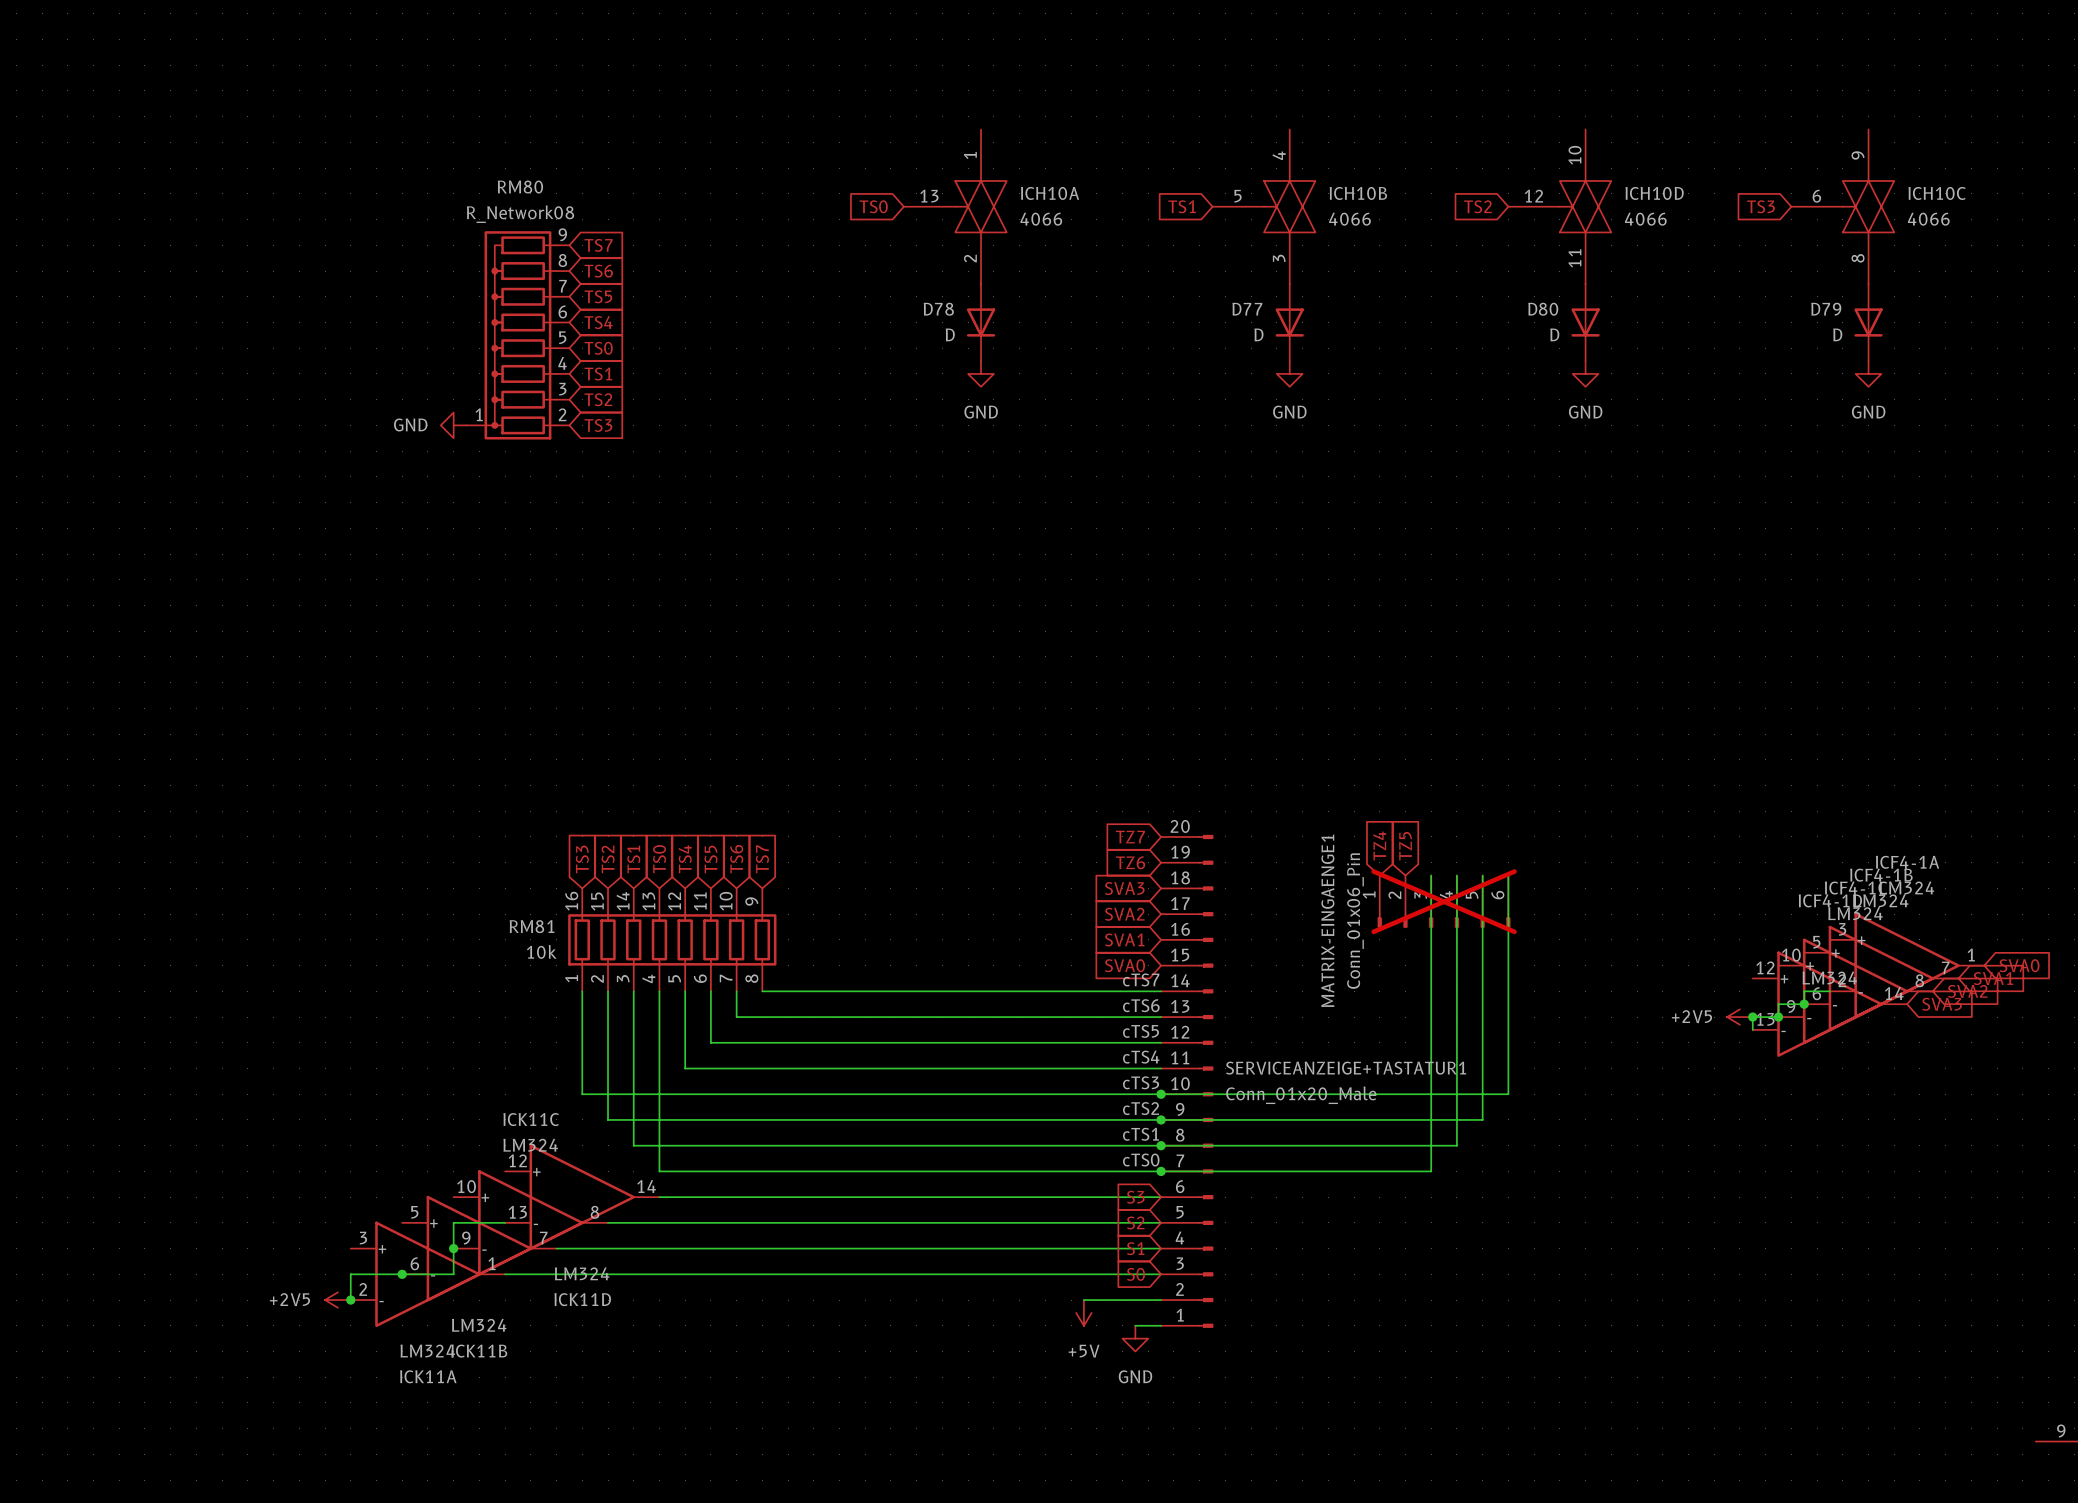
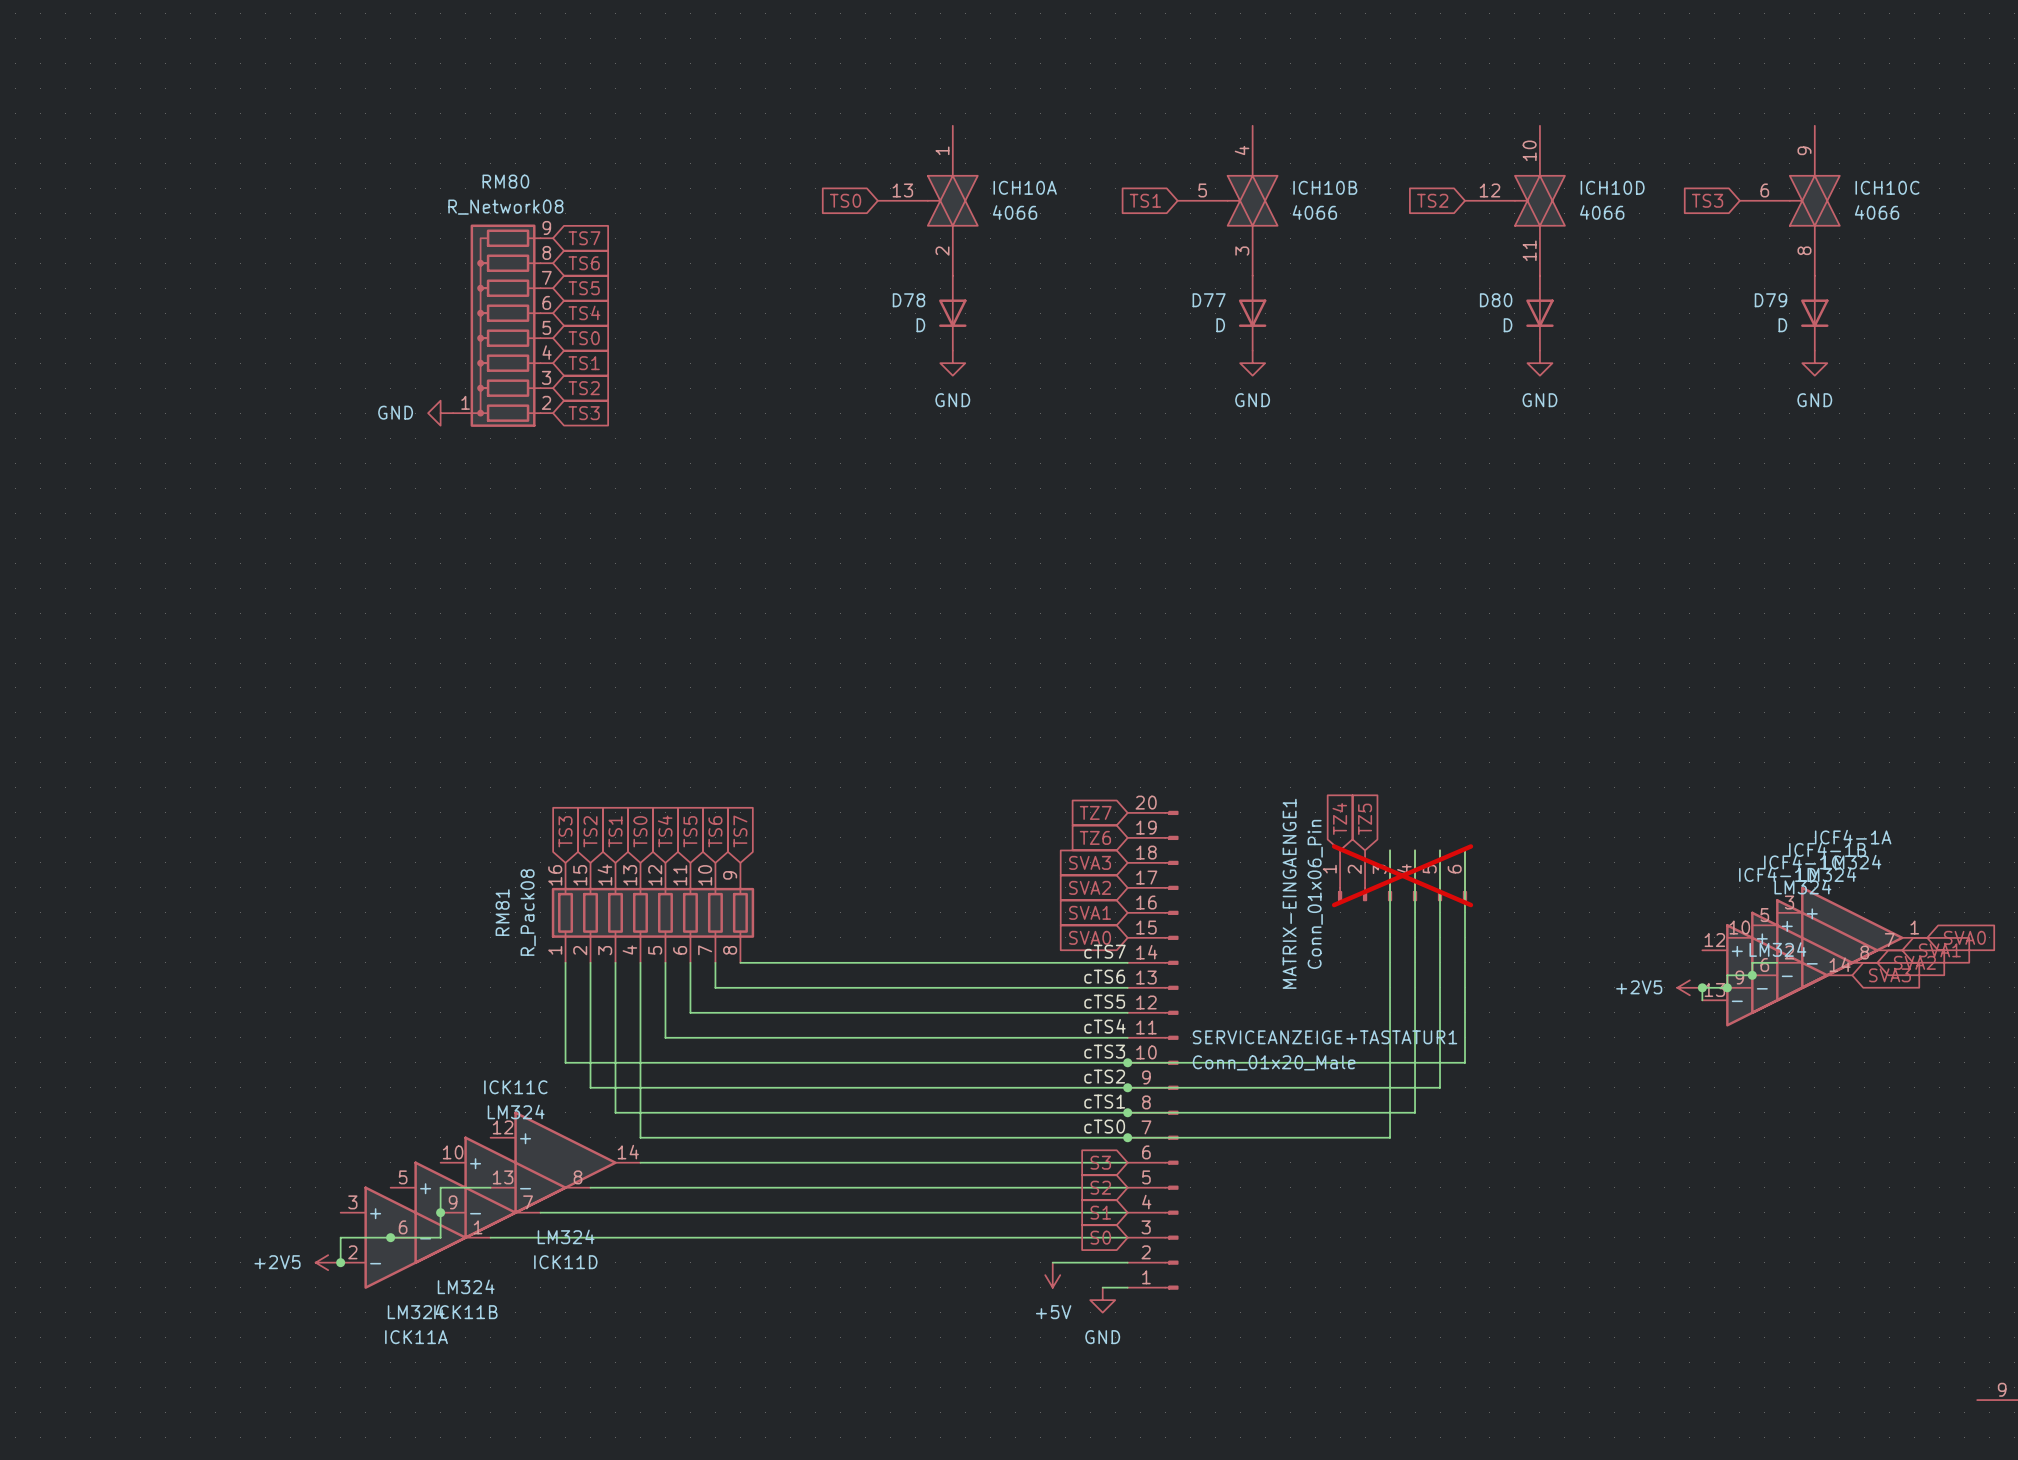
RM81 name rotation: 0° (532, 926) -> 90° counterclockwise (502, 912)
RM81 value: 10k (541, 951) -> R_Pack08 (528, 912)

